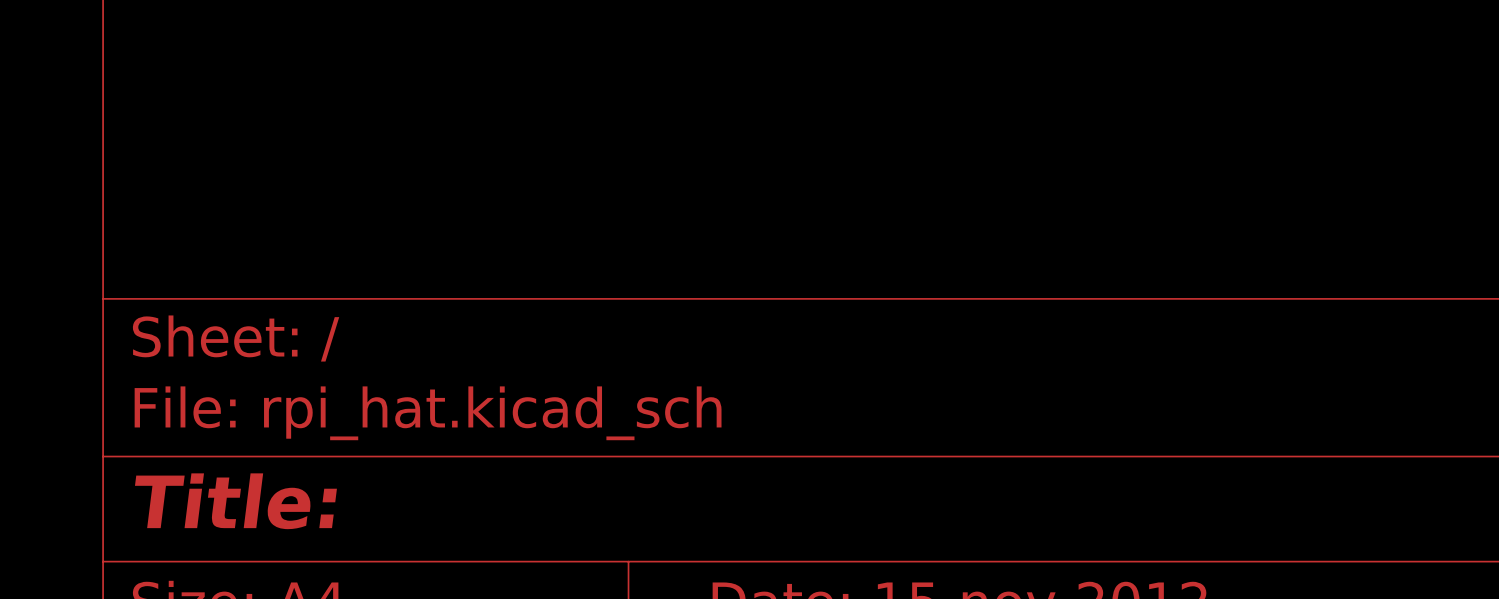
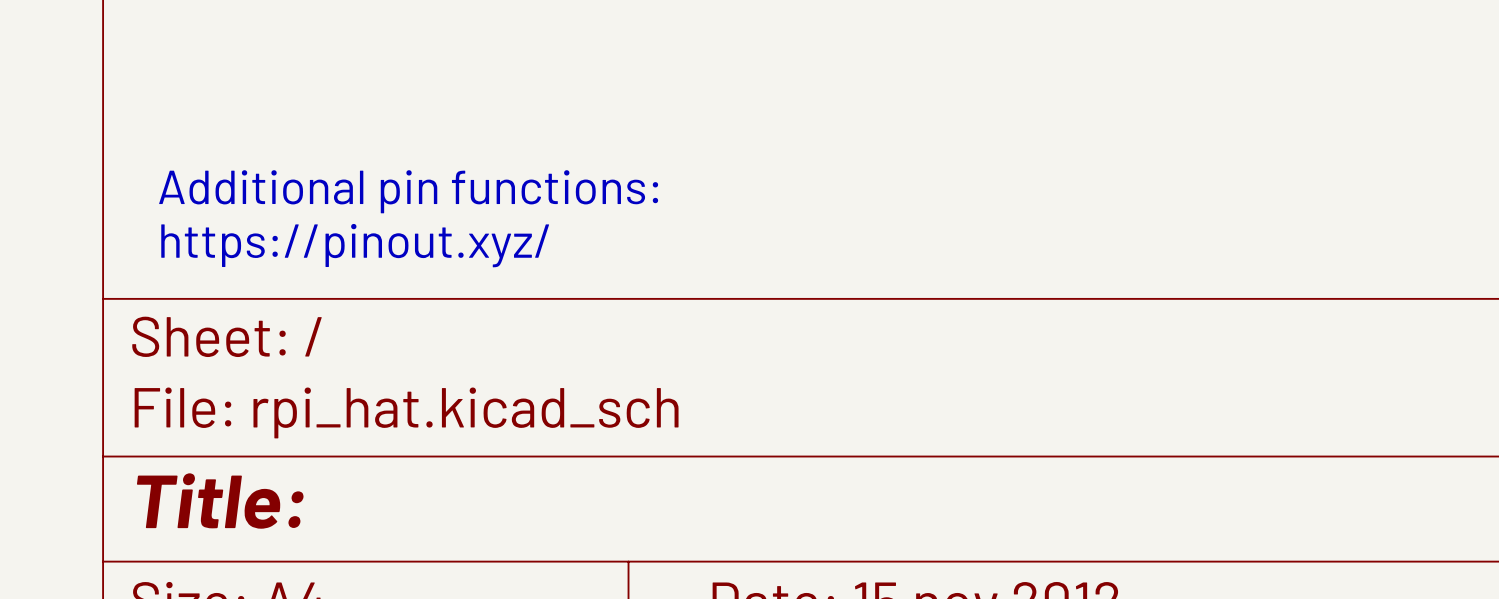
text: none -> Additional pin functions: (408, 191)
text: none -> https://pinout.xyz/ (355, 245)

